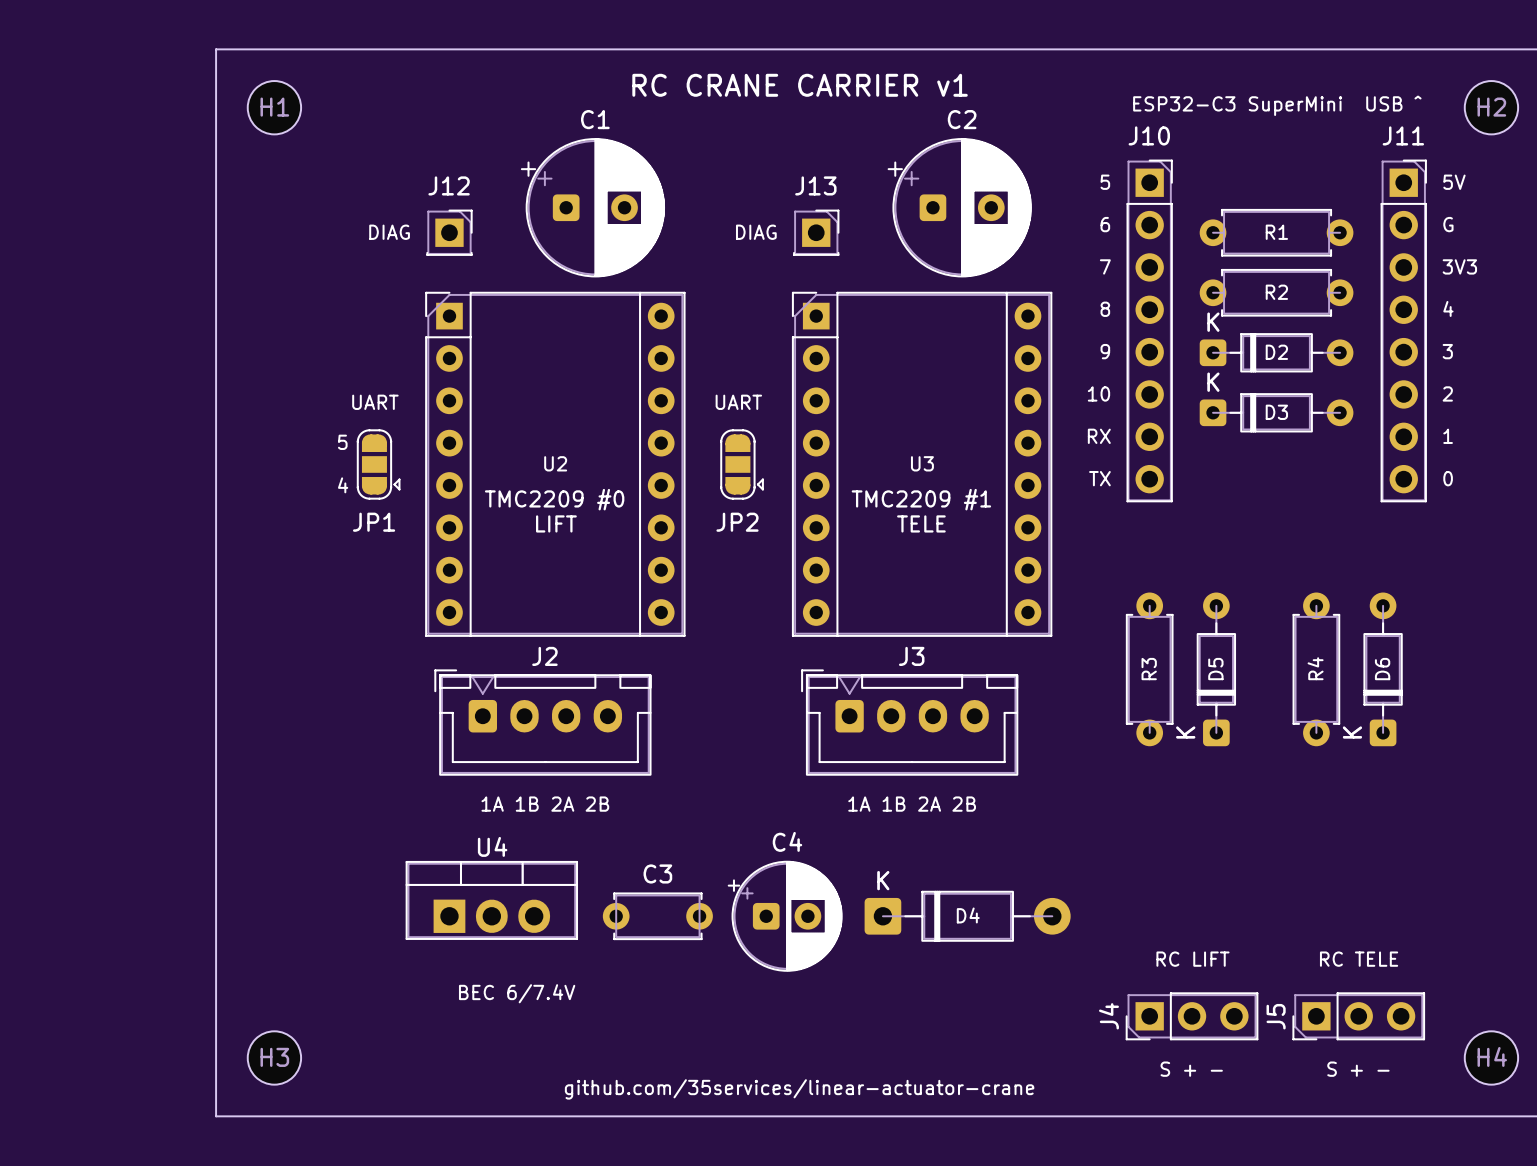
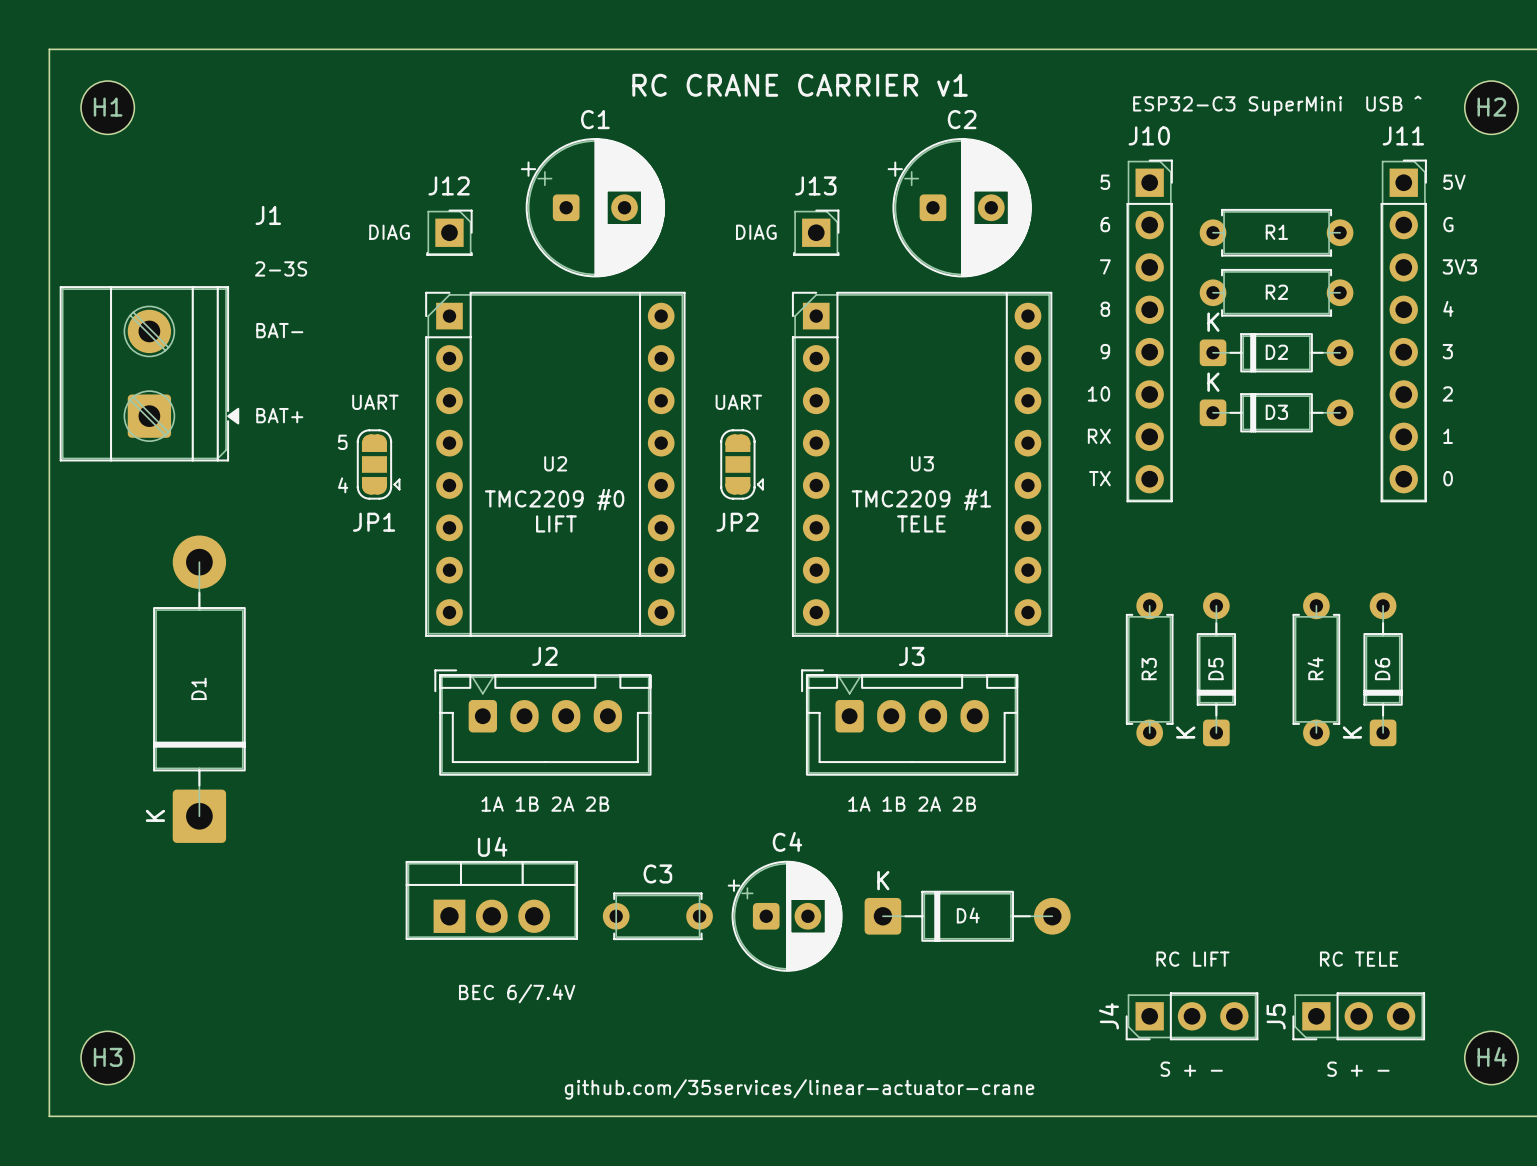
board edge: (216, 49) (216, 1116) -> (216, 49) (49, 49) (49, 1116) (216, 1116)
H1 position: (274, 107) -> (107, 107)
text: none -> 2-3S (281, 268)
text: none -> BAT- (279, 330)
J1: none -> (149, 373)
text: none -> BAT+ (279, 415)
D1: none -> (199, 689)
H3 position: (274, 1057) -> (107, 1057)

